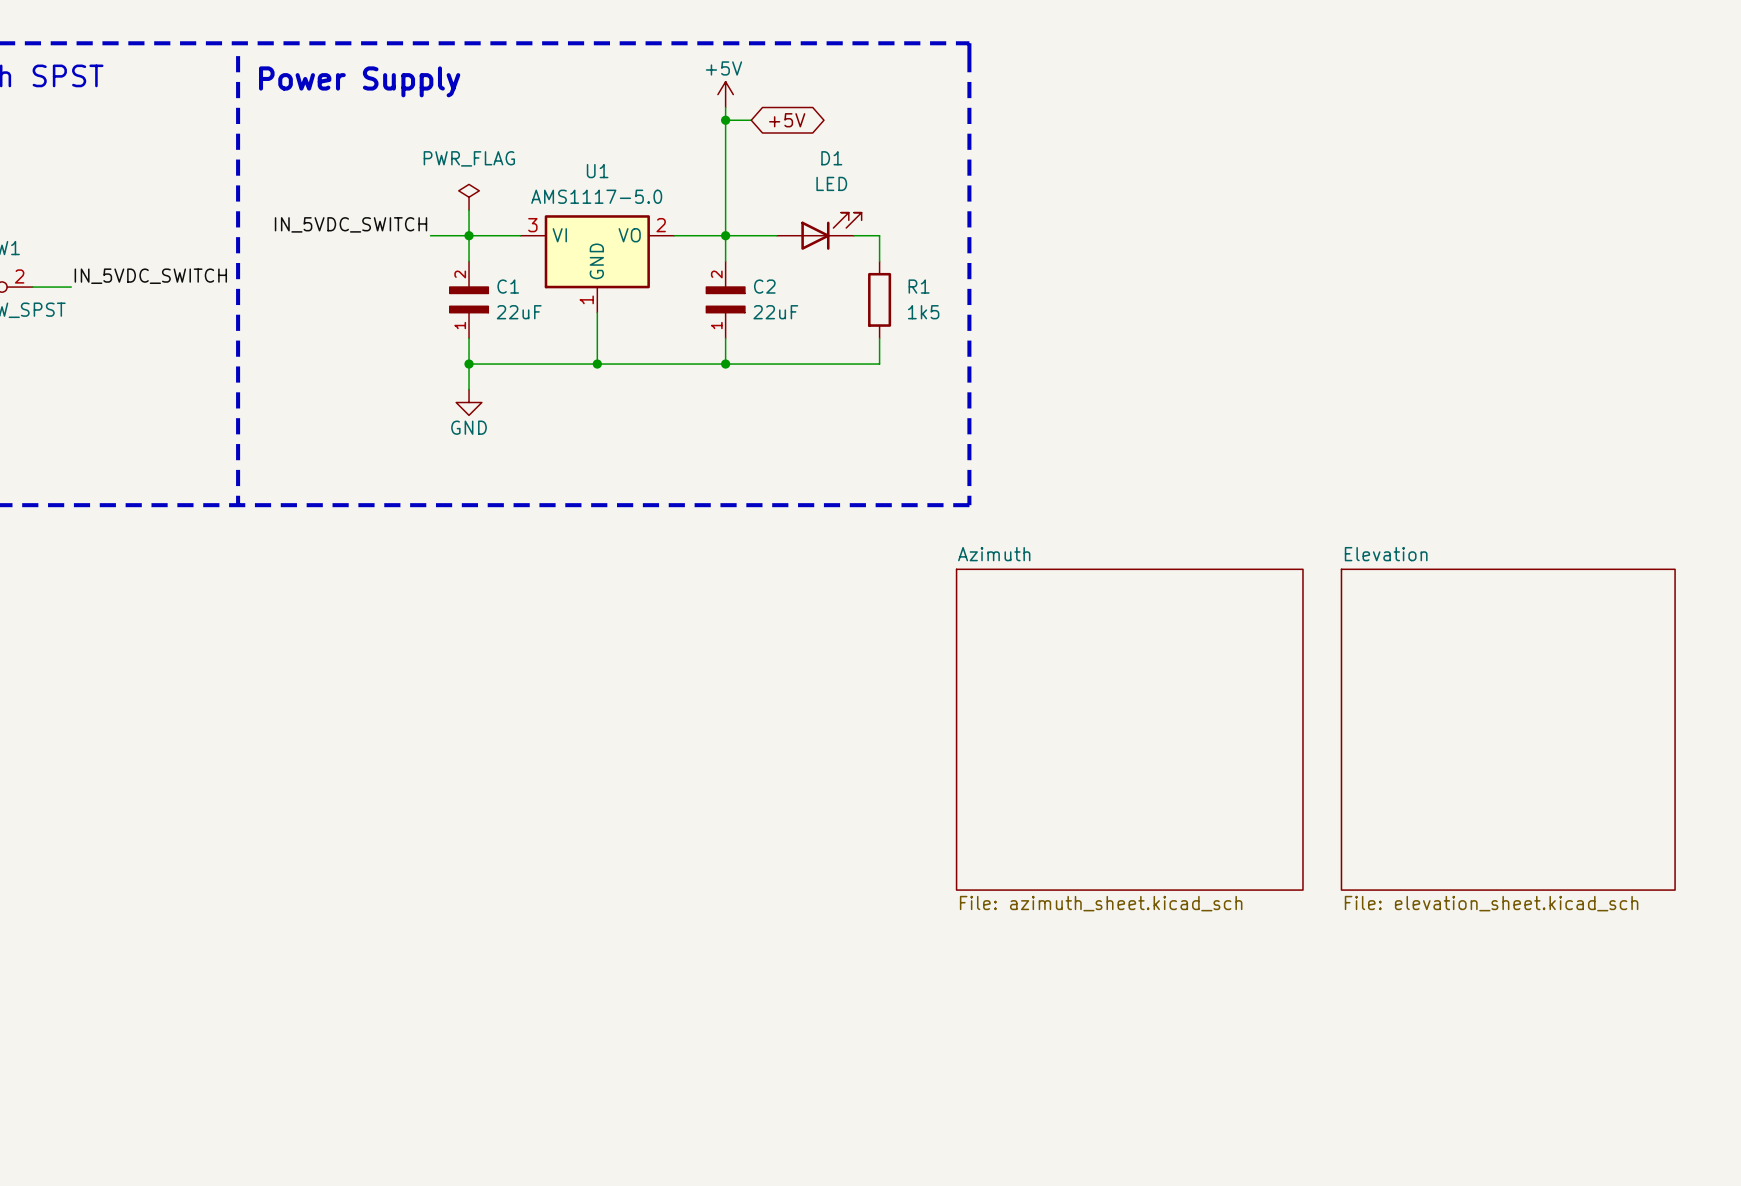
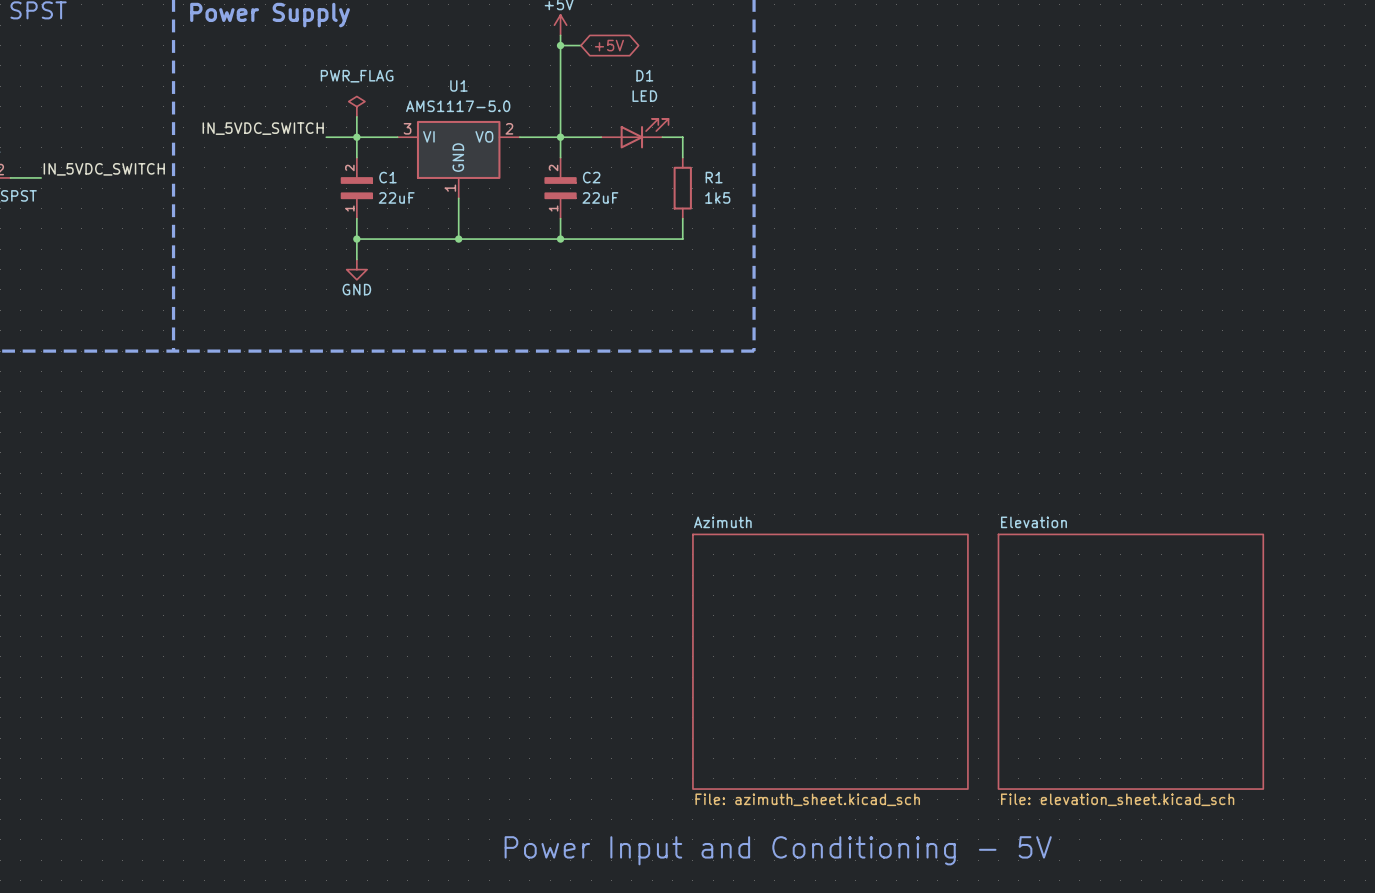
sheet Azimuth position: (1129, 729) -> (830, 661)
sheet Elevation position: (1508, 729) -> (1130, 661)
text: none -> Power Input and Conditioning - 5V (778, 850)

